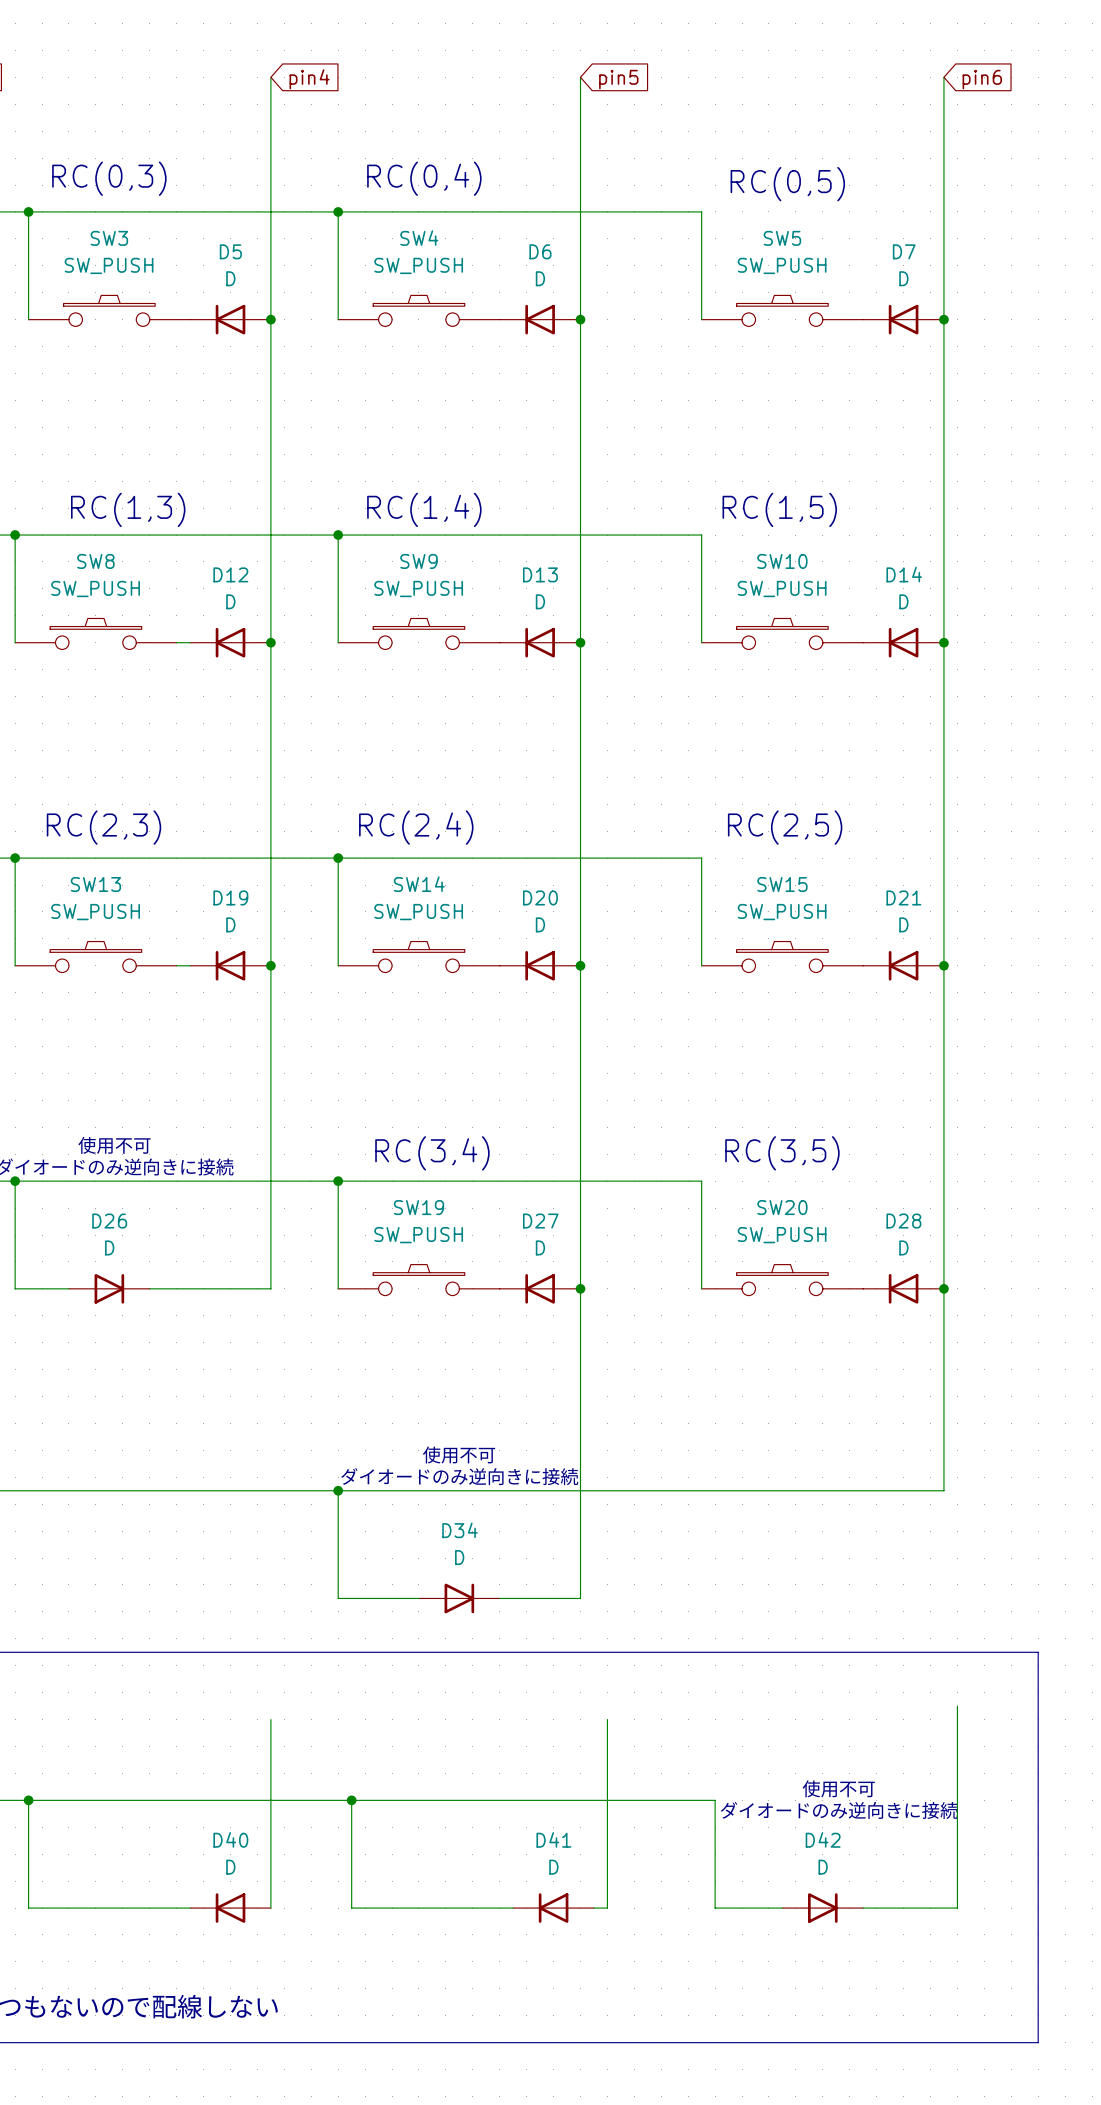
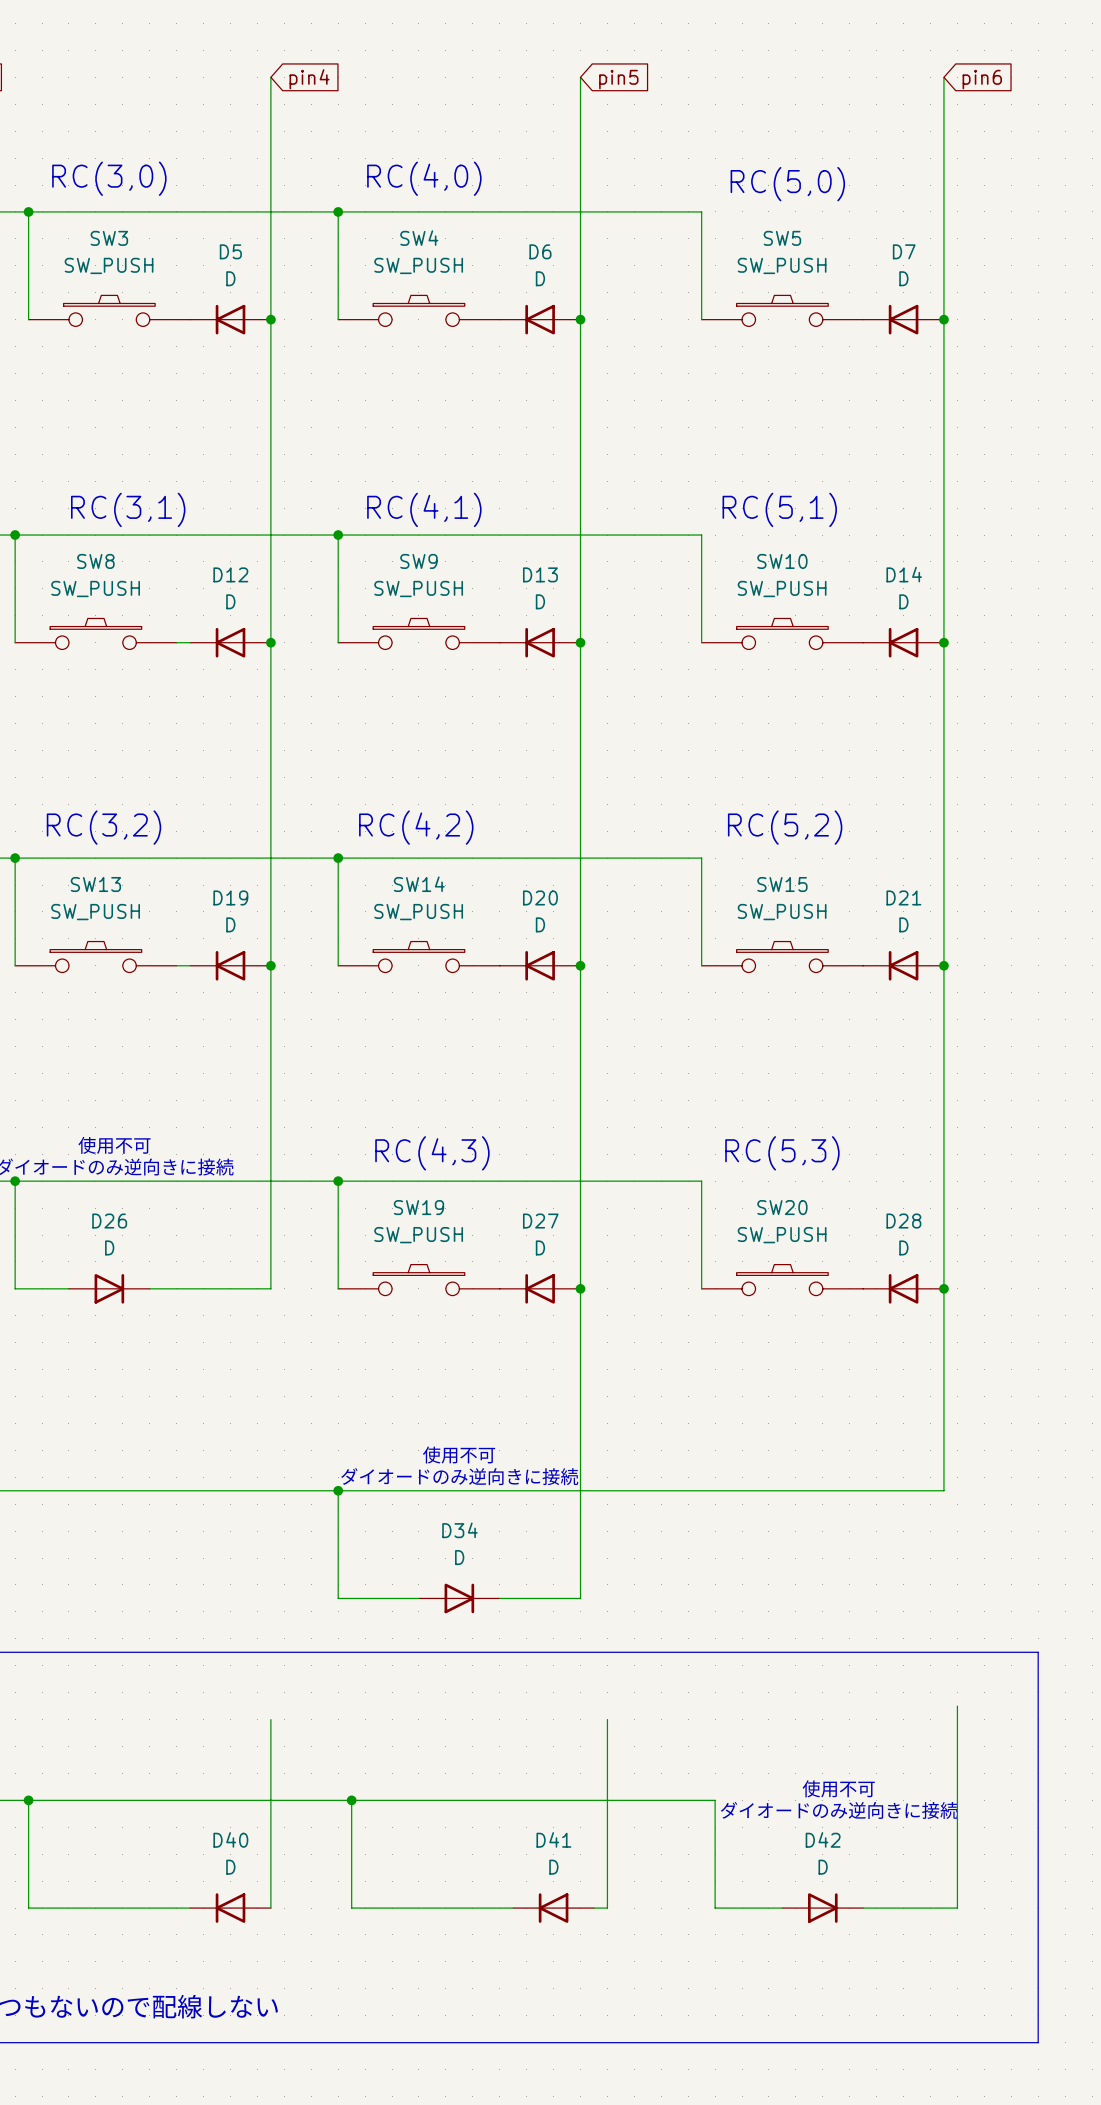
text: RC(0,3) (109, 178) -> RC(3,0) (109, 178)
text: RC(0,4) (424, 178) -> RC(4,0) (424, 178)
text: RC(0,5) (787, 184) -> RC(5,0) (787, 184)
text: RC(1,3) (128, 509) -> RC(3,1) (128, 509)
text: RC(1,4) (424, 509) -> RC(4,1) (424, 509)
text: RC(1,5) (779, 509) -> RC(5,1) (779, 509)
text: RC(2,3) (103, 827) -> RC(3,2) (103, 827)
text: RC(2,4) (416, 827) -> RC(4,2) (416, 827)
text: RC(2,5) (785, 827) -> RC(5,2) (785, 827)
text: RC(3,4) (432, 1153) -> RC(4,3) (432, 1153)
text: RC(3,5) (782, 1153) -> RC(5,3) (782, 1153)

